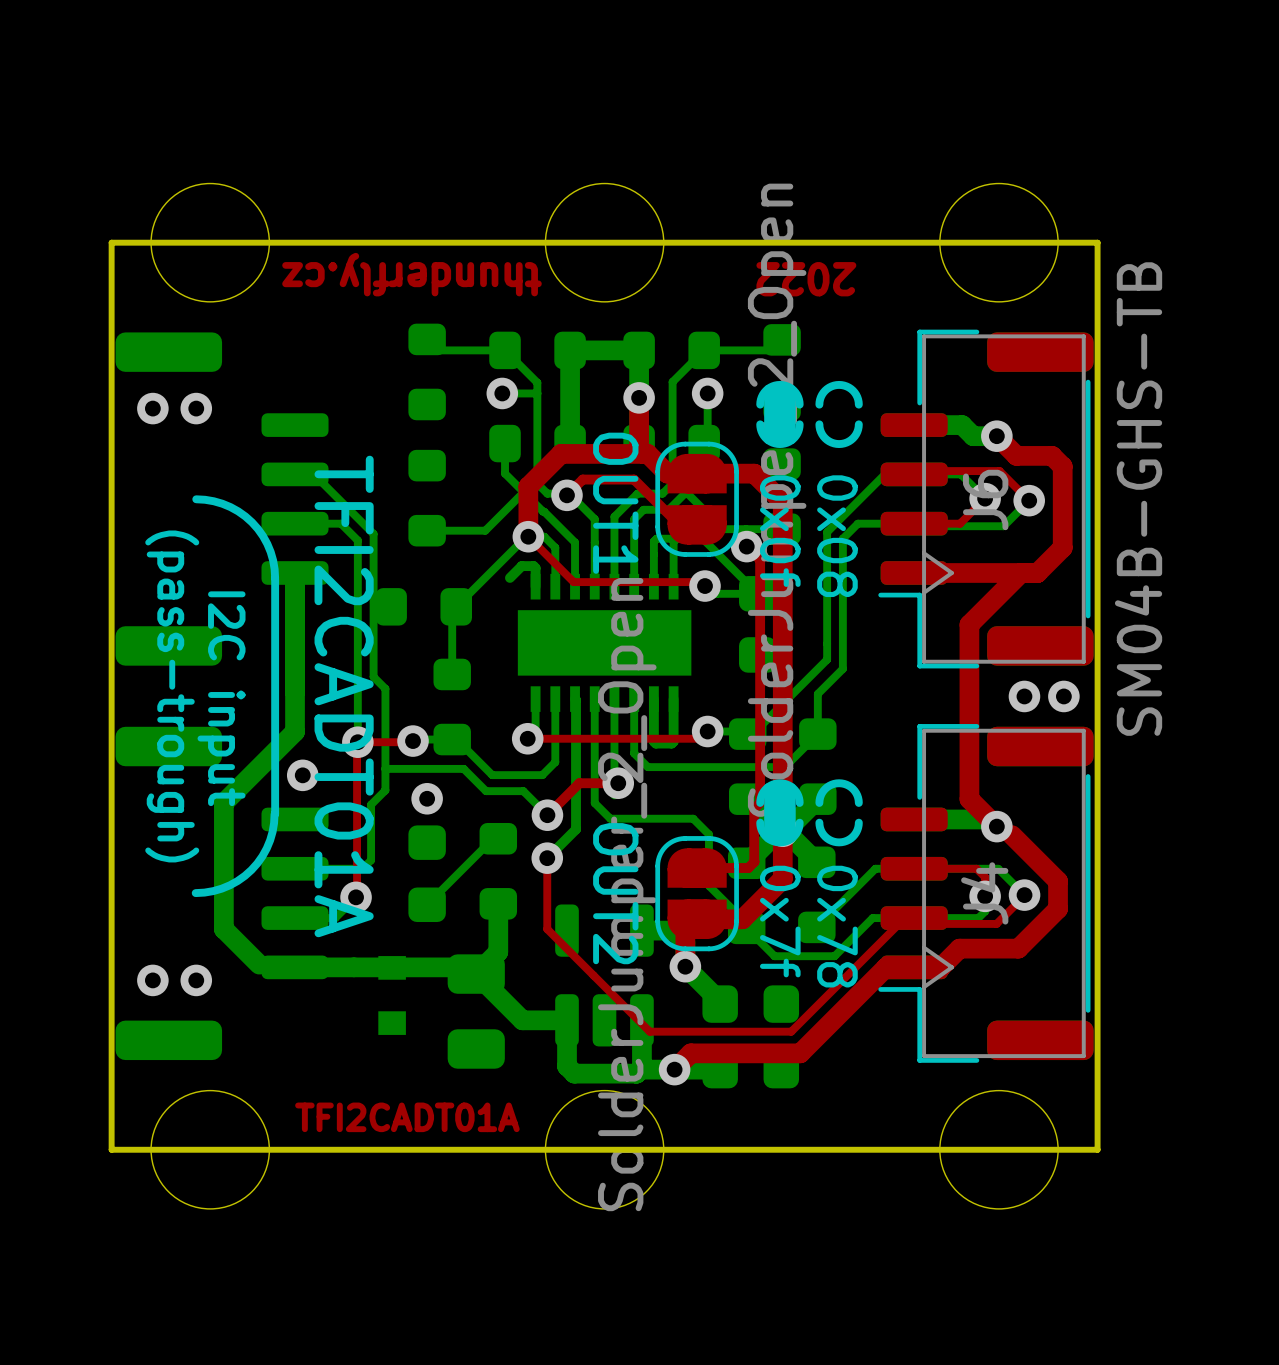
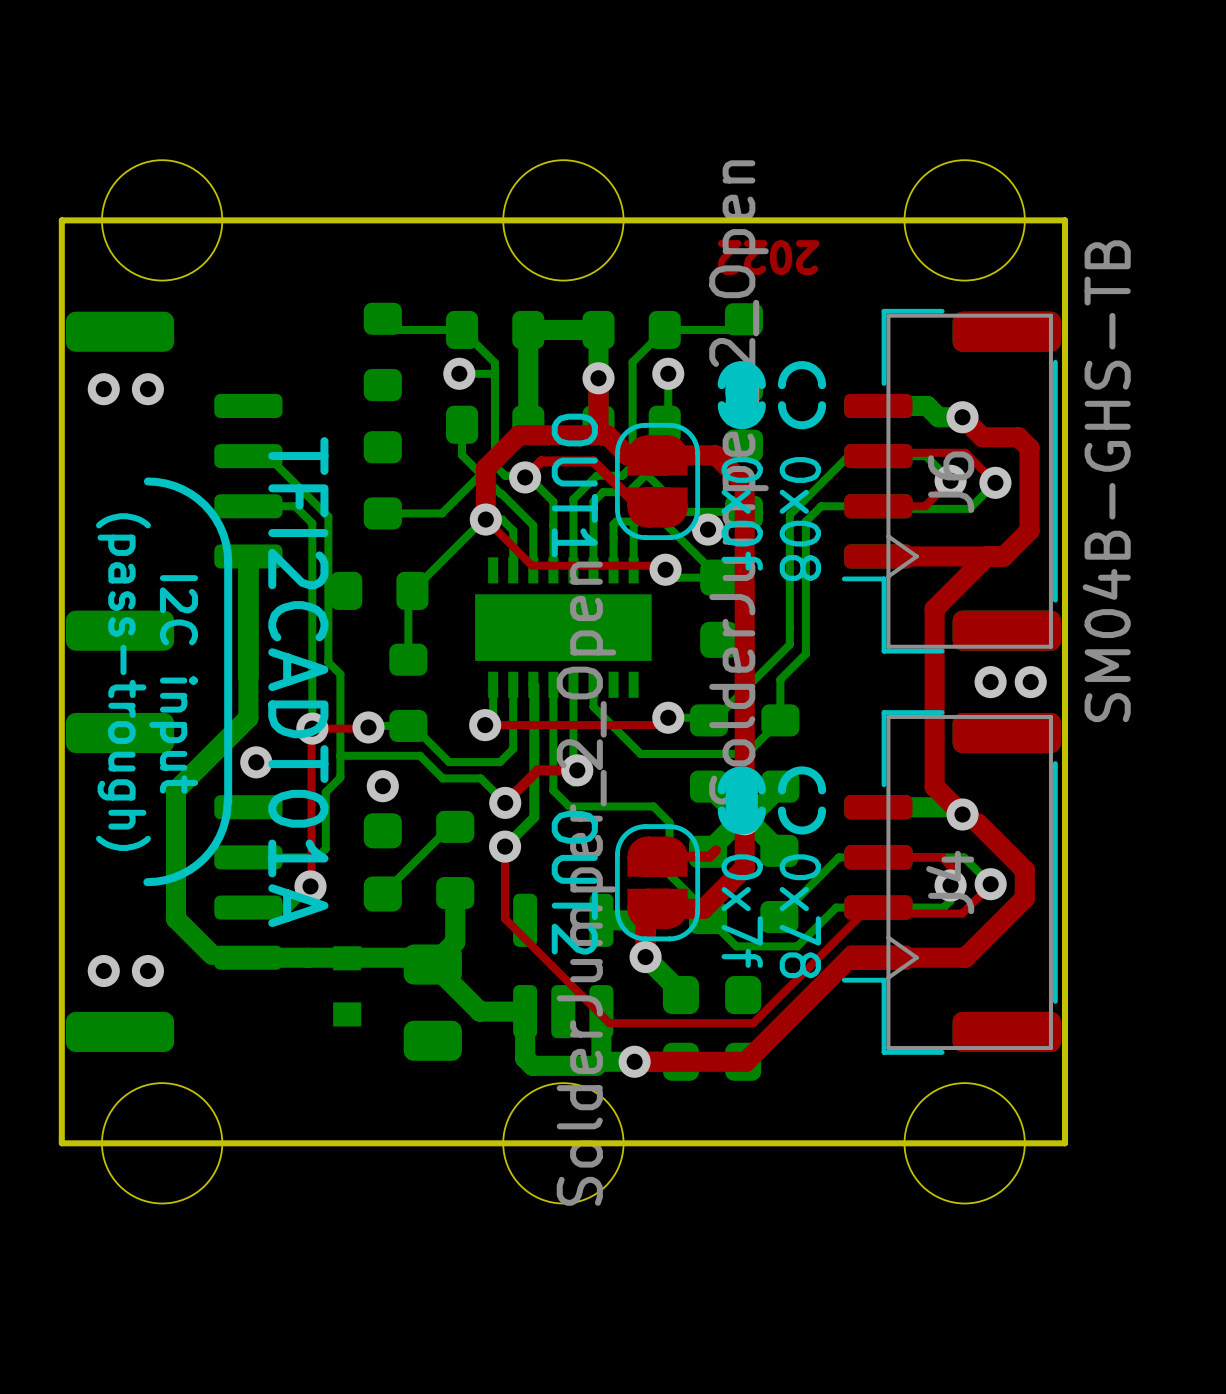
text: thunderfly.cz (412, 274) -> none
top track: (746, 546) (760, 560) (760, 802) (754, 808) (754, 861) -> none
bottom track: (509, 577) (521, 566) (533, 566) (535, 568) (535, 586) -> none
bottom track: (653, 699) (653, 741) (655, 743) (671, 743) (673, 741) (673, 699) -> none
bottom track: (634, 720) (634, 753) (647, 767) (680, 767) -> (593, 706) (640, 753)
top track: (1018, 948) (959, 948) (940, 967) -> (984, 938) (965, 957) (905, 957)
top track: (800, 1053) (690, 1053) (674, 1069) -> (762, 1045) (745, 1061) (634, 1061)
text: TFI2CADT01A (407, 1117) -> none

